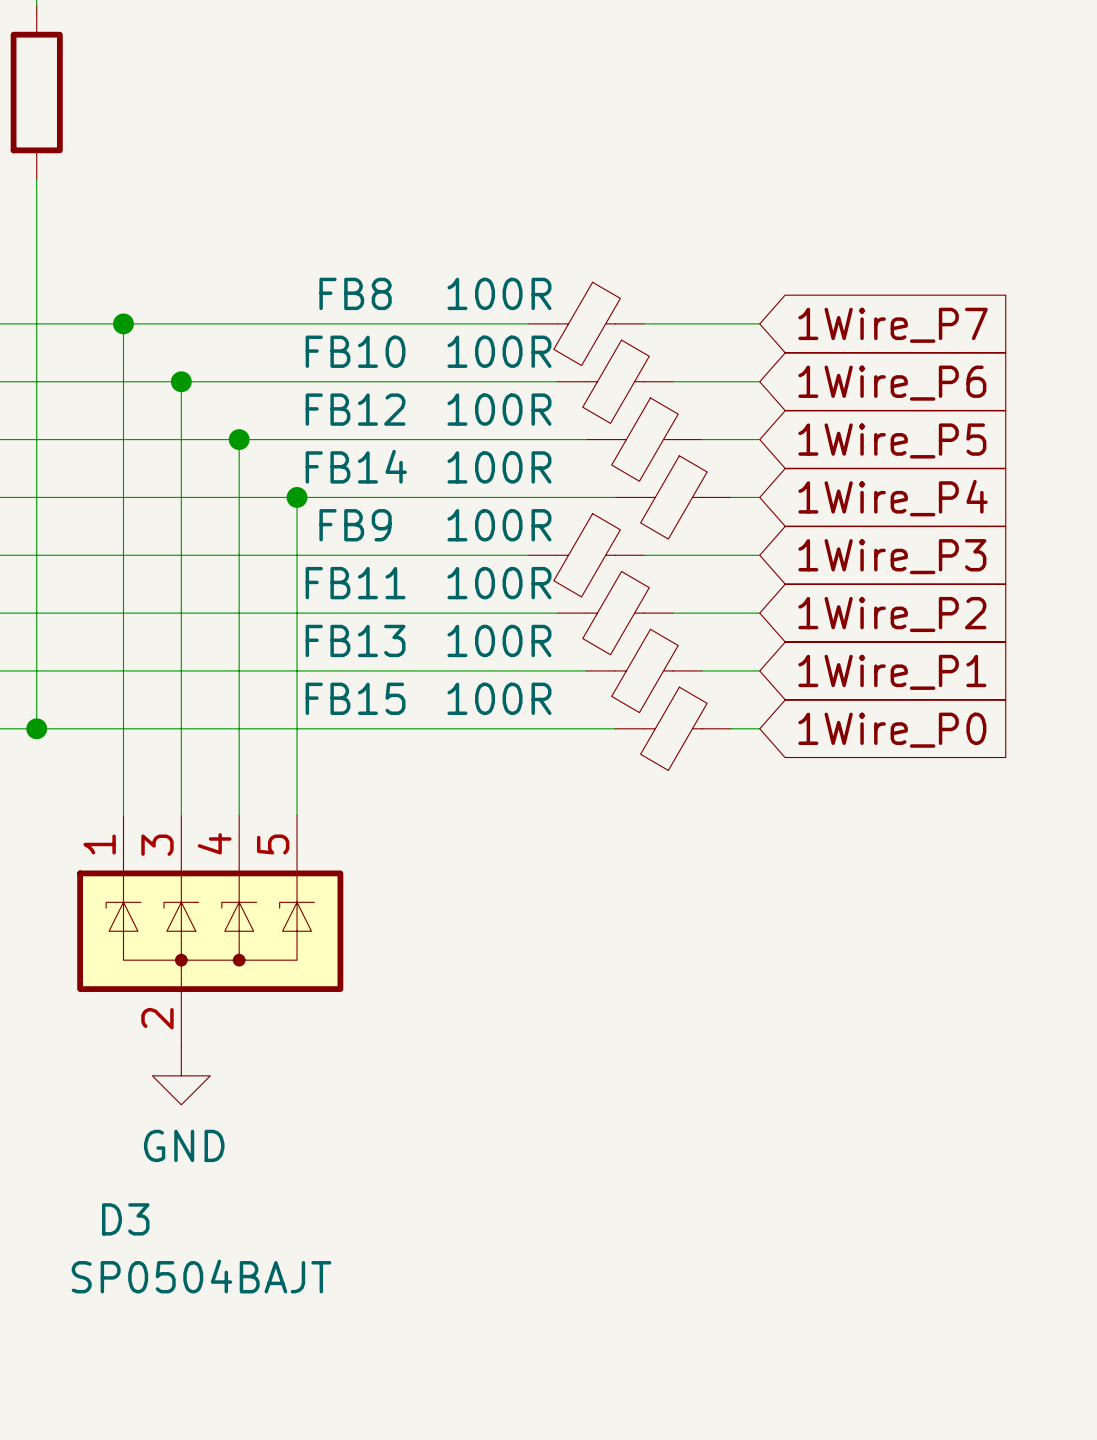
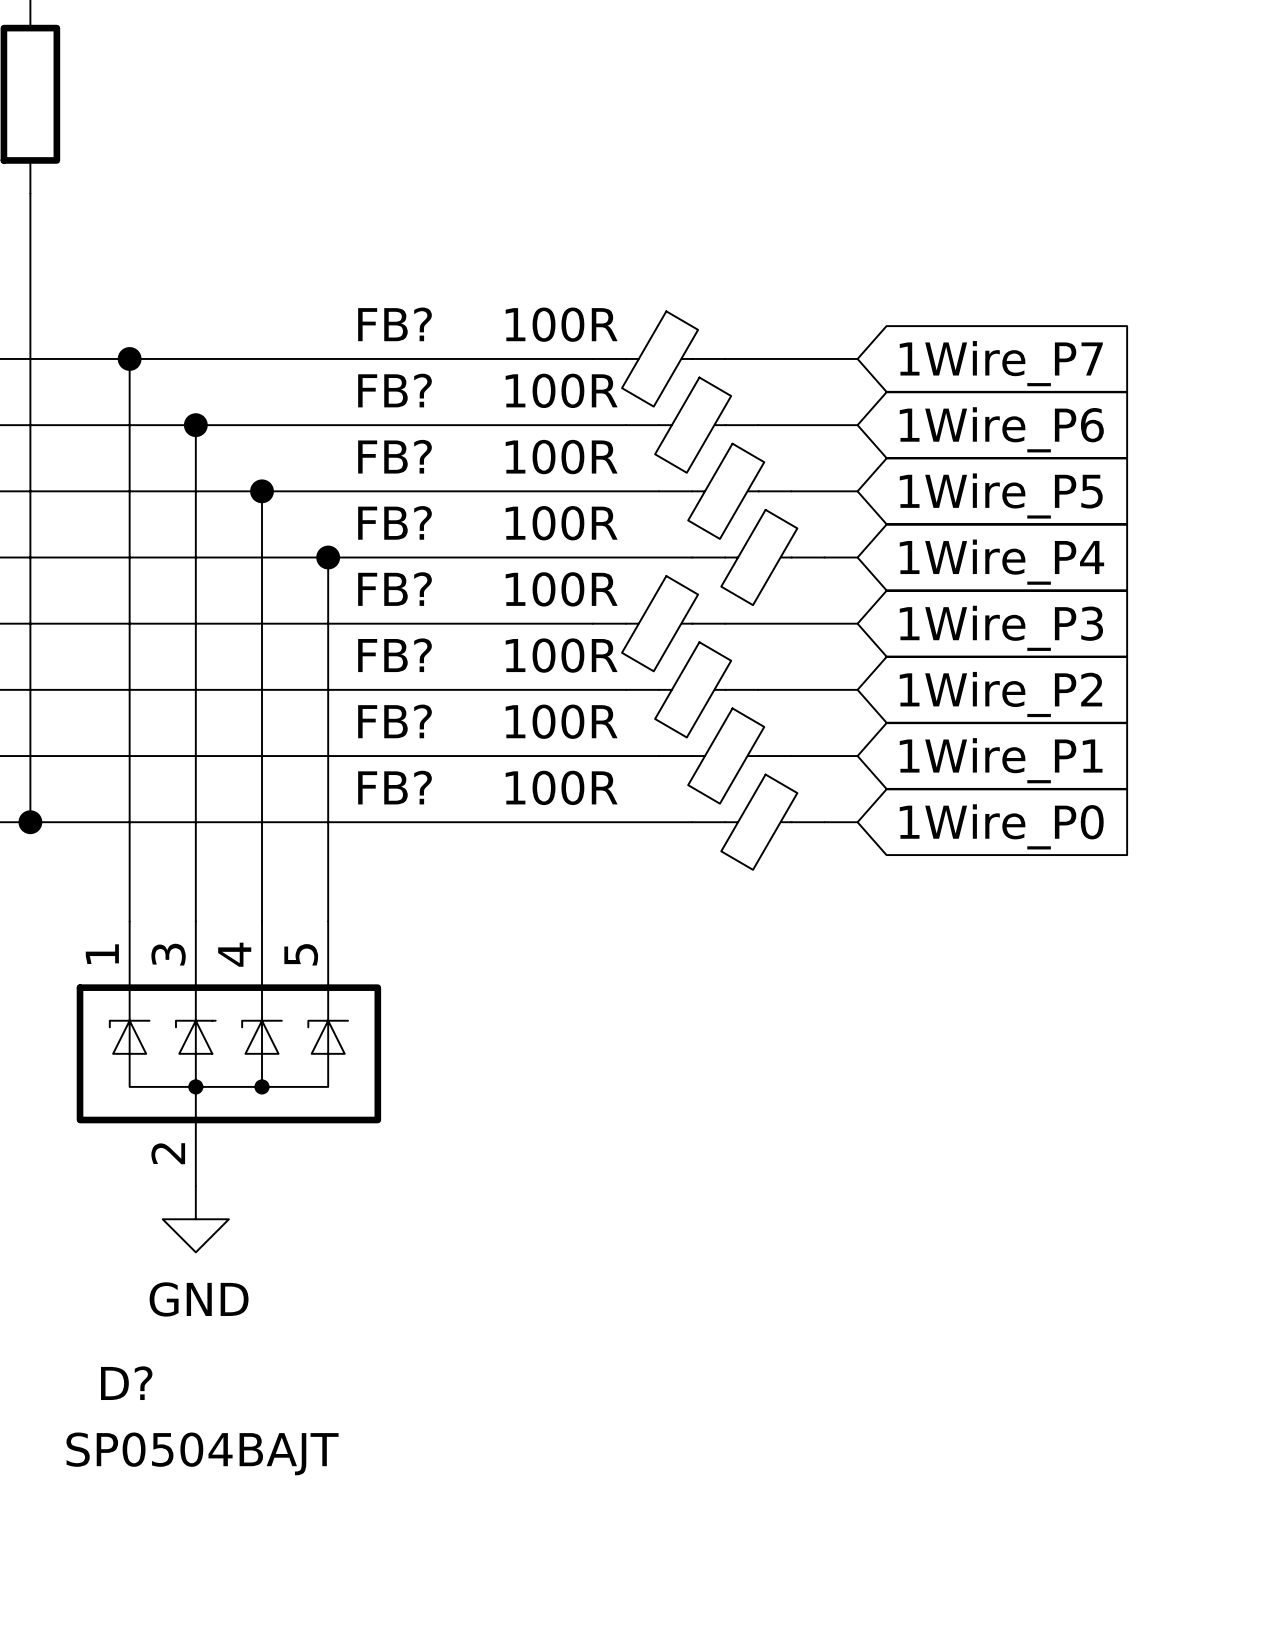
FB8 name: FB8 (355, 293) -> FB? (395, 324)
FB10 name: FB10 (355, 351) -> FB? (395, 390)
FB12 name: FB12 (355, 409) -> FB? (395, 456)
FB14 name: FB14 (356, 466) -> FB? (395, 522)
FB9 name: FB9 (355, 525) -> FB? (395, 589)
FB11 name: FB11 (355, 583) -> FB? (395, 655)
FB13 name: FB13 (355, 640) -> FB? (395, 721)
FB15 name: FB15 (355, 698) -> FB? (395, 787)
D3 name: D3 (125, 1219) -> D? (126, 1383)

